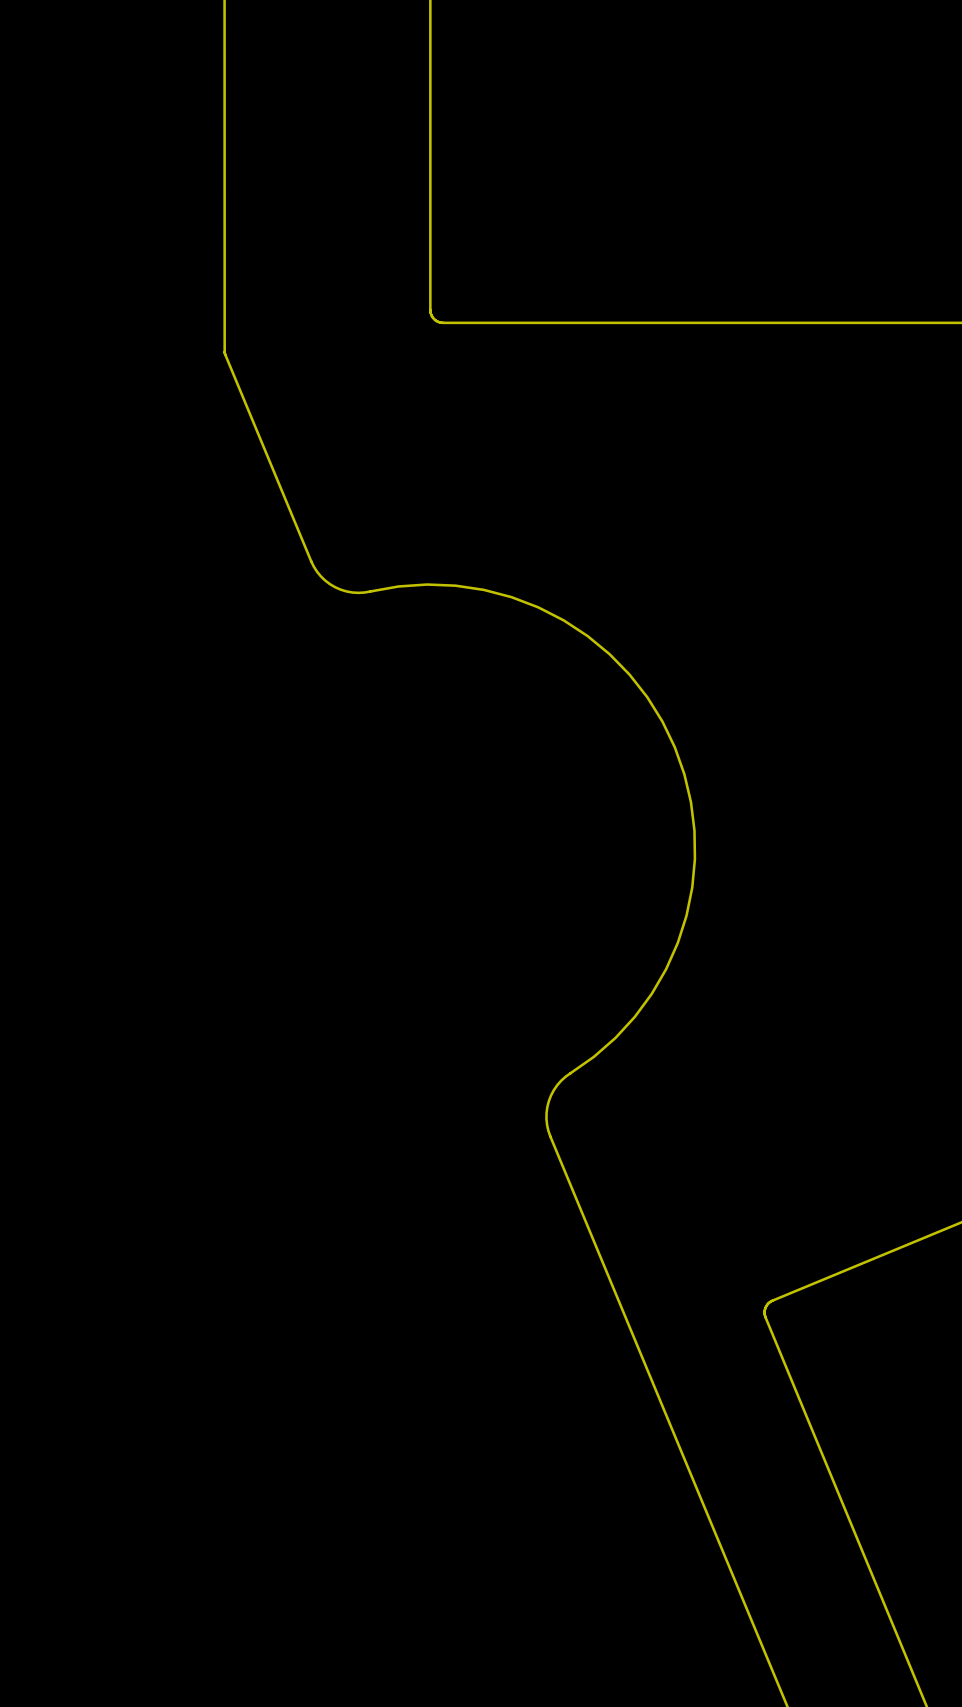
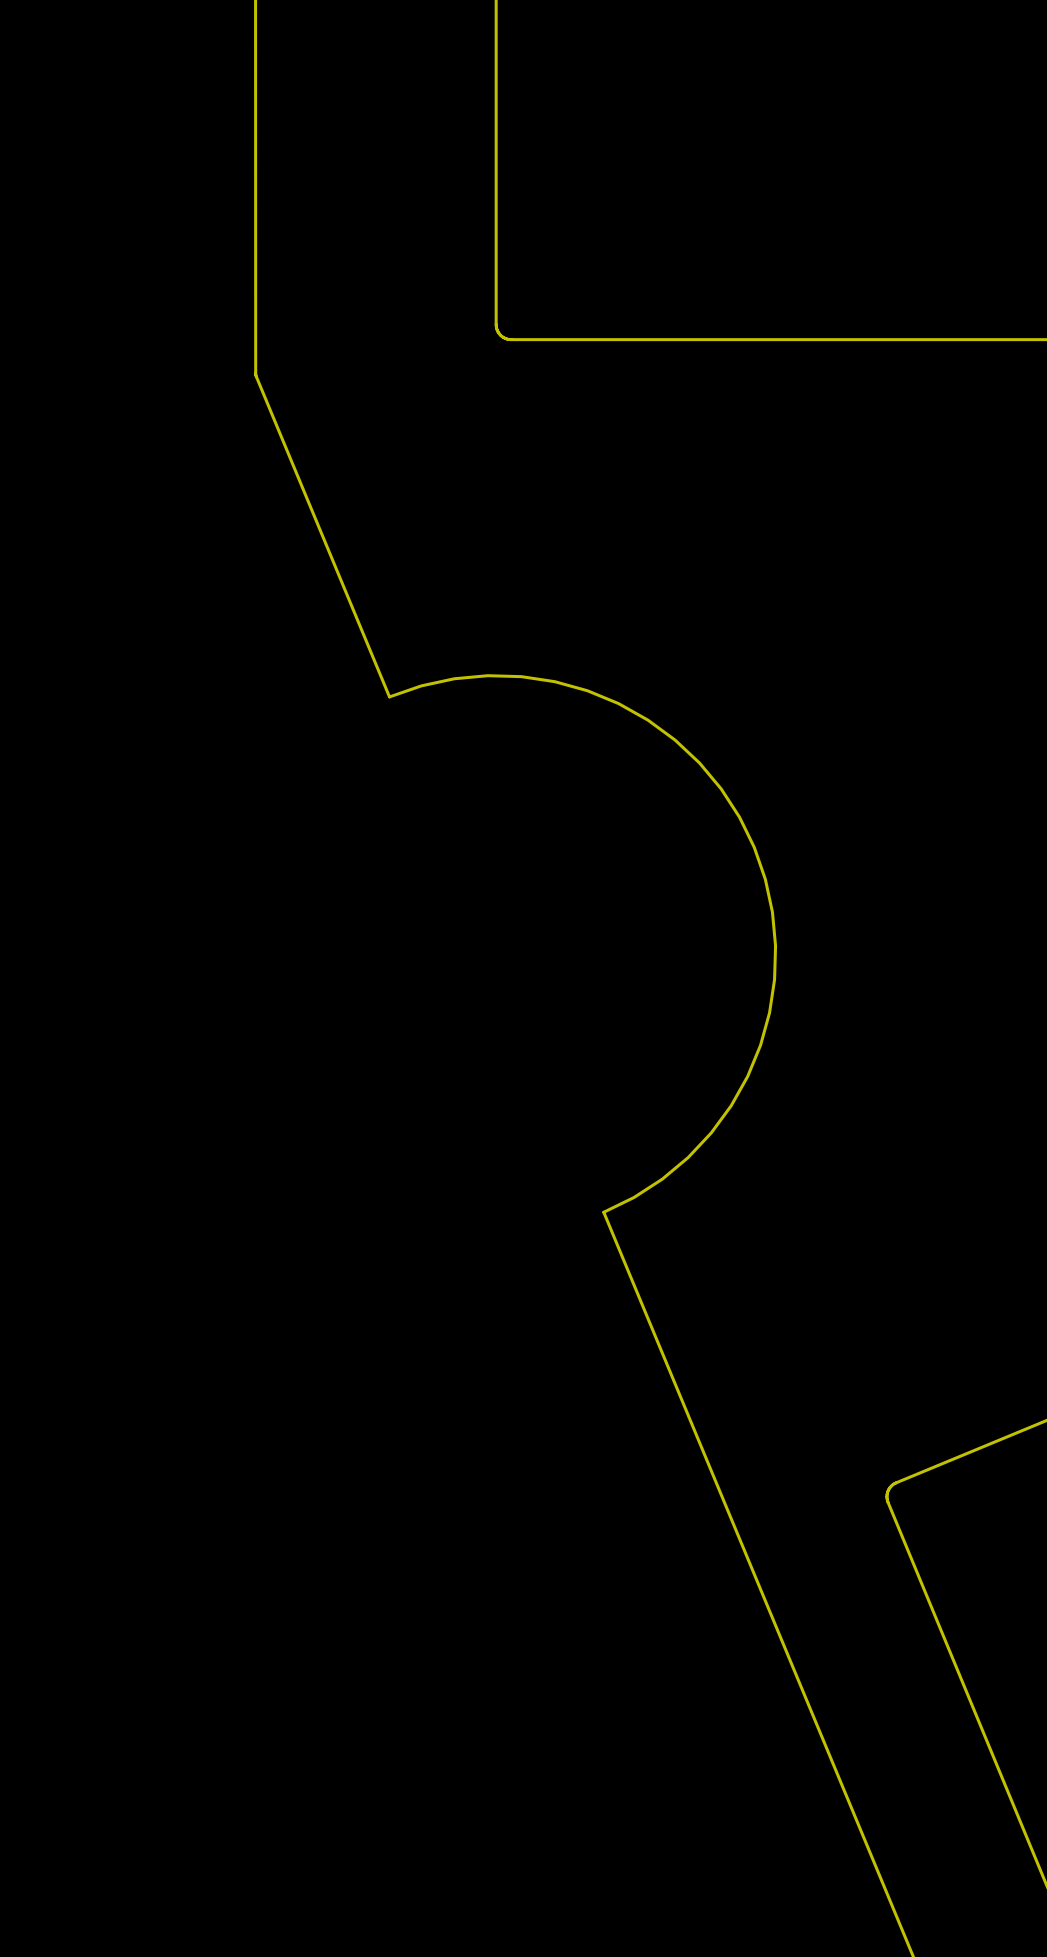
board edge: (311, 561) (325, 580) (346, 591) (364, 592) (398, 586) (427, 584) (455, 585) (483, 589) (511, 597) (538, 607) (563, 620) (587, 636) (609, 654) (629, 674) (647, 697) (662, 721) (674, 747) (684, 774) (690, 802) (694, 830) (694, 859) (692, 887) (686, 915) (677, 942) (666, 969) (651, 993) (634, 1016) (615, 1037) (594, 1056) (565, 1076) (553, 1090) (546, 1112) (550, 1136) -> (356, 618) (389, 696) (421, 685) (454, 678) (487, 675) (521, 676) (554, 681) (587, 690) (618, 703) (647, 720) (675, 739) (699, 763) (721, 788) (739, 817) (754, 847) (765, 879) (772, 912) (775, 945) (774, 979) (769, 1012) (760, 1045) (747, 1076) (731, 1105) (711, 1132) (688, 1157) (662, 1179) (634, 1197) (603, 1212) (636, 1290)

